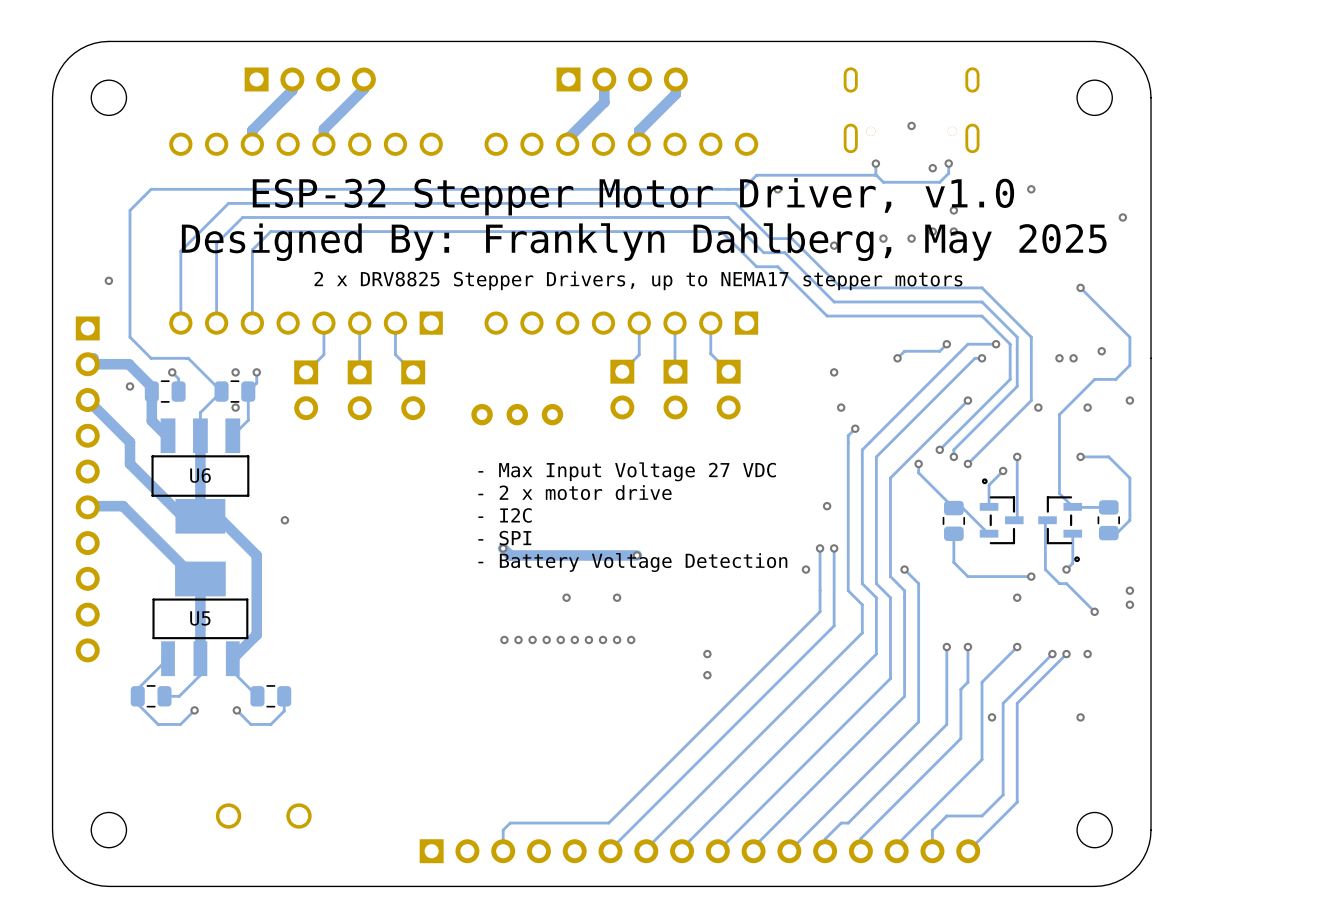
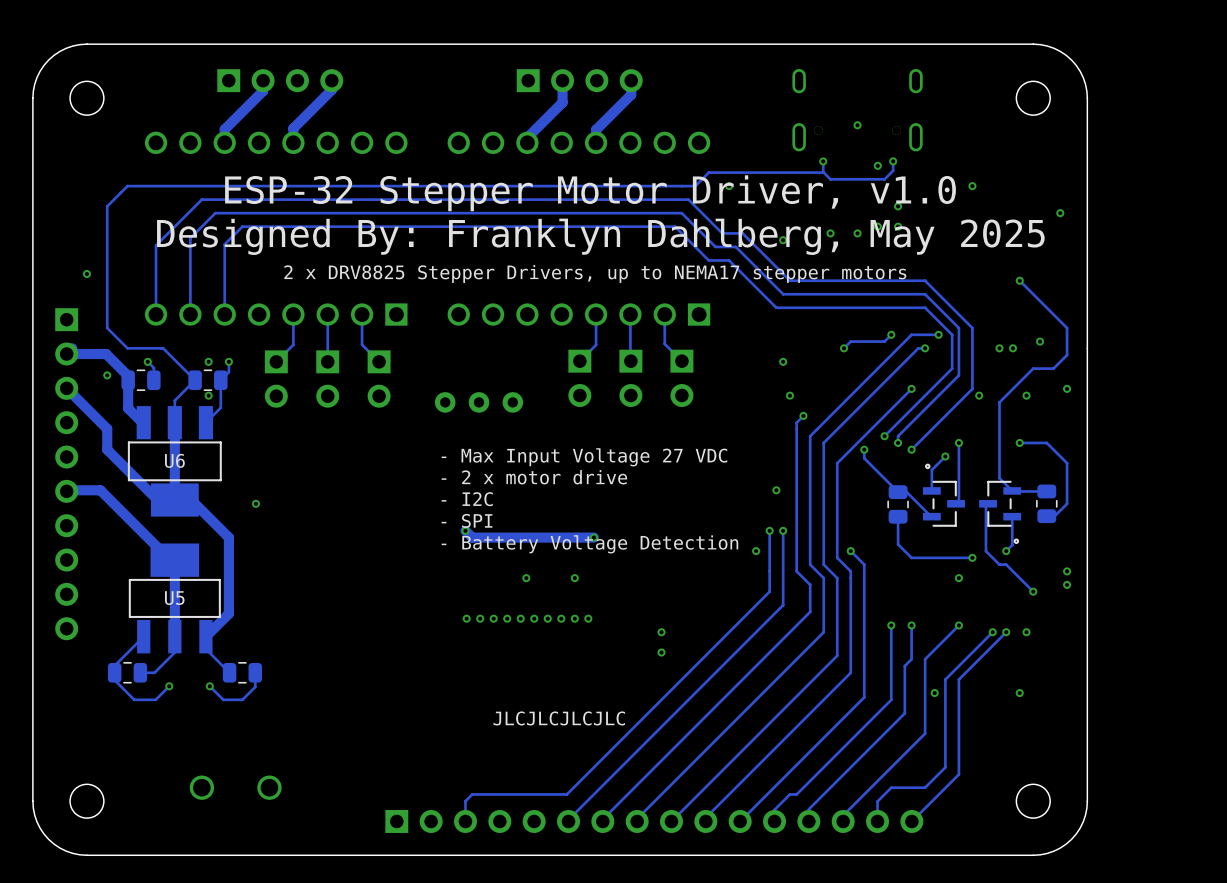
text: none -> JLCJLCJLCJLC (559, 718)

